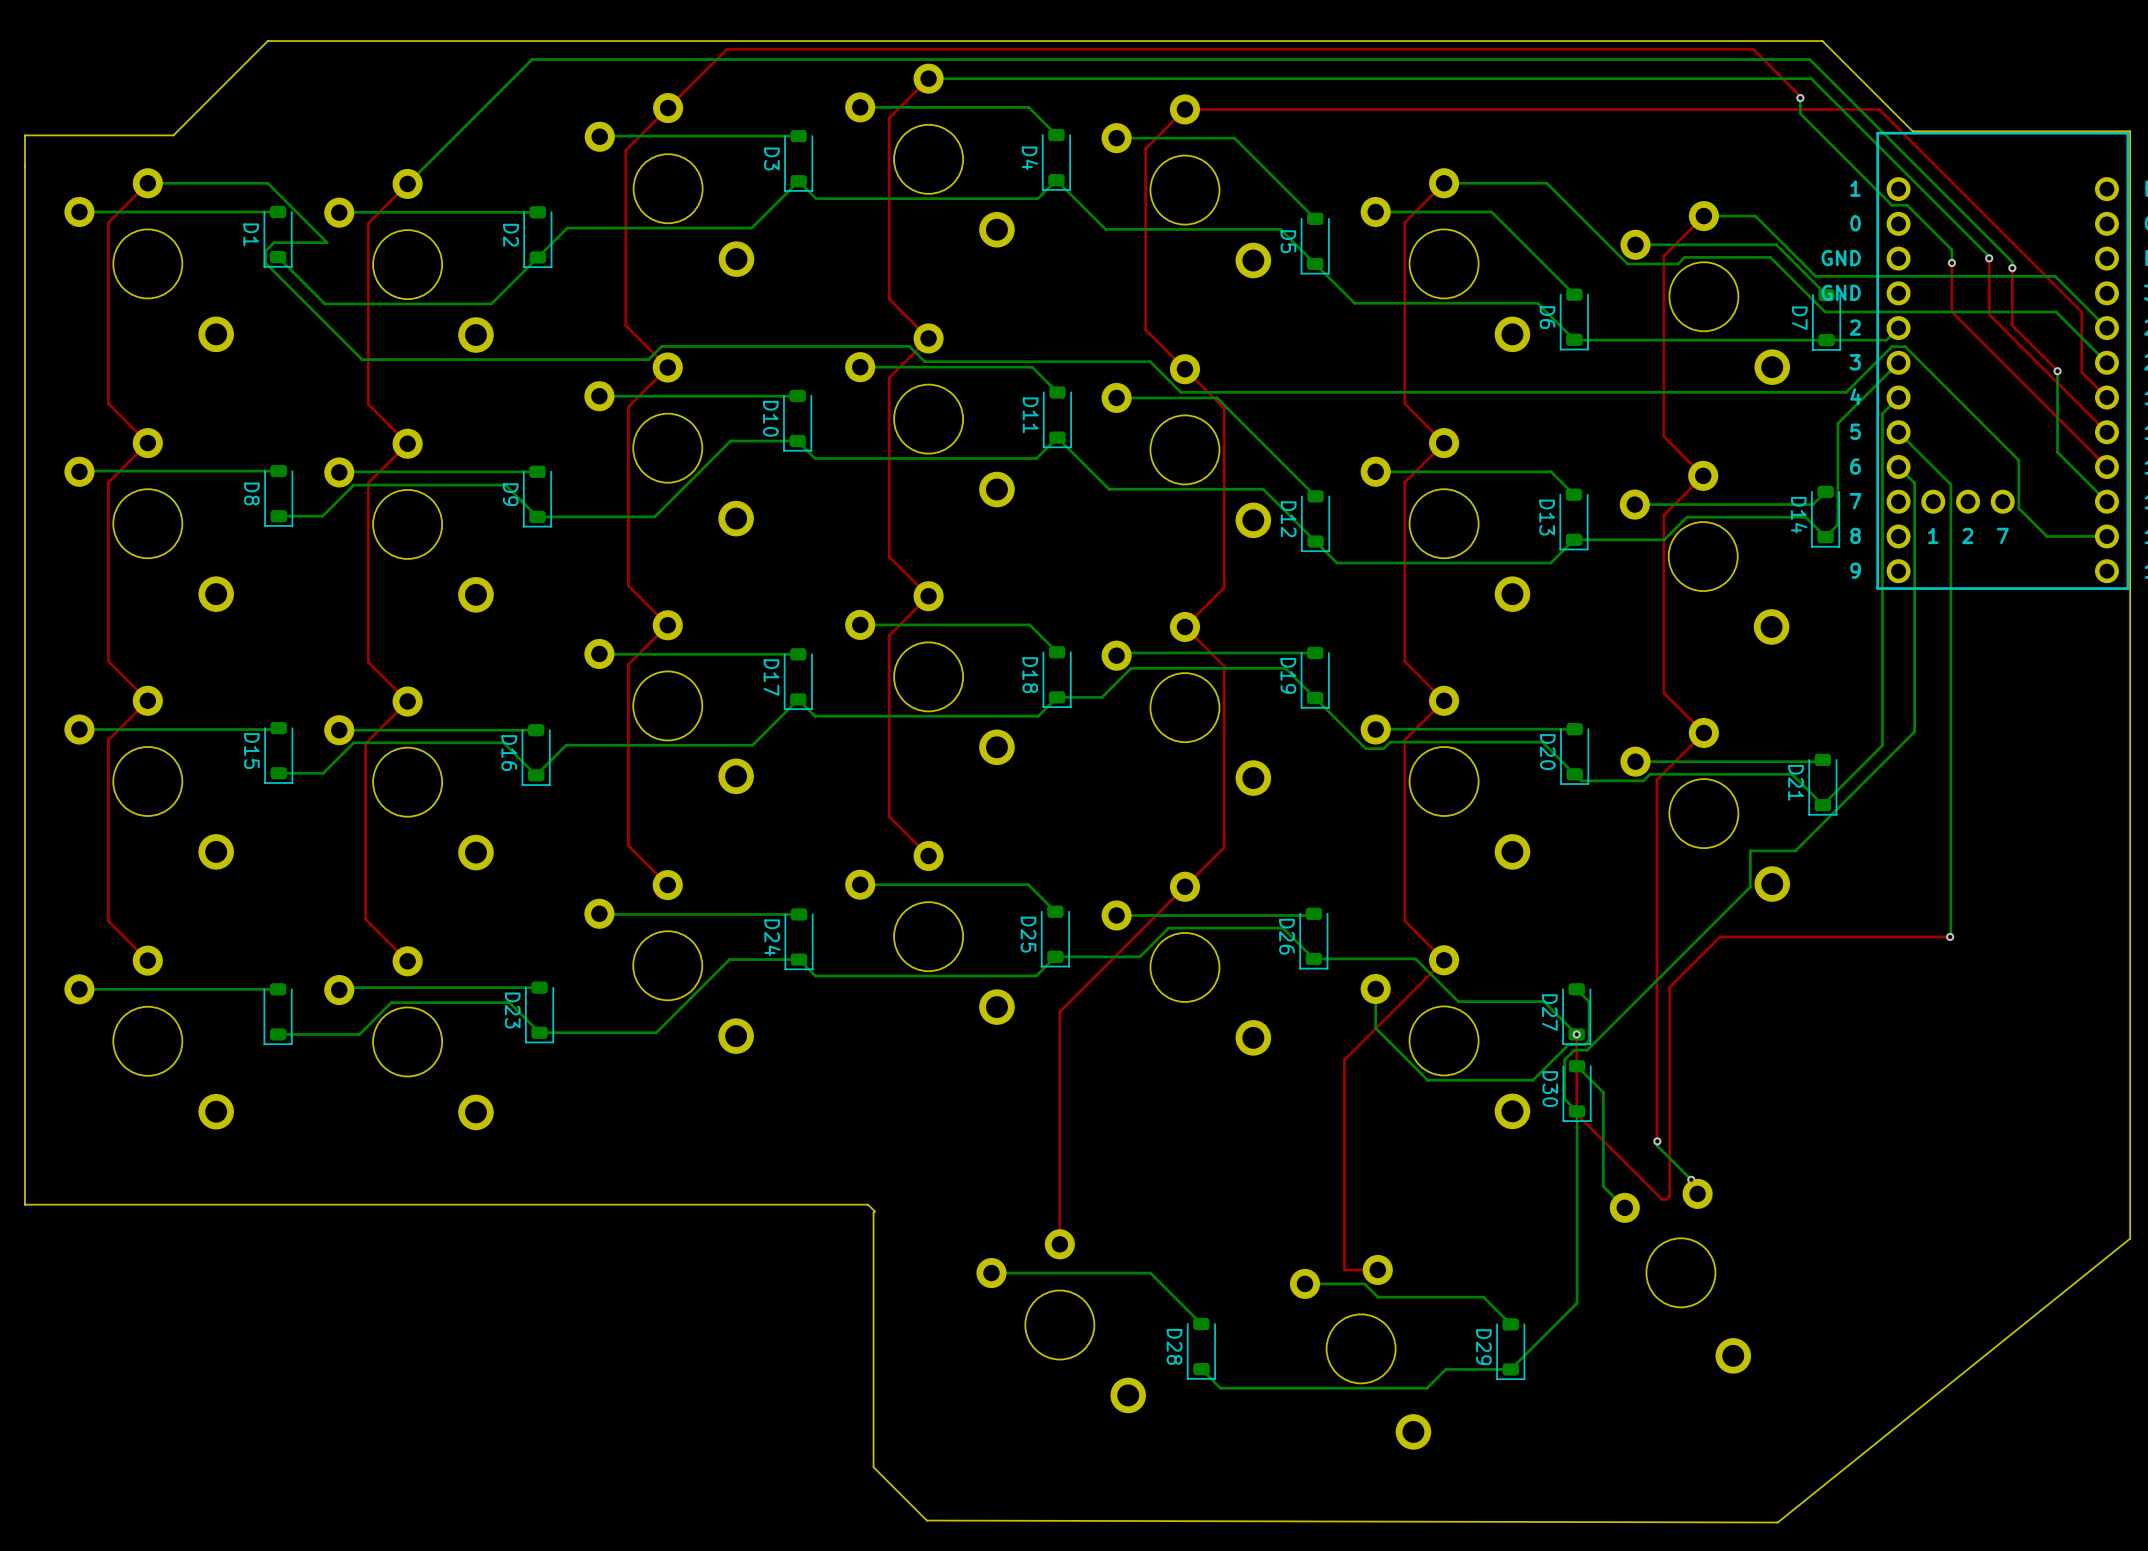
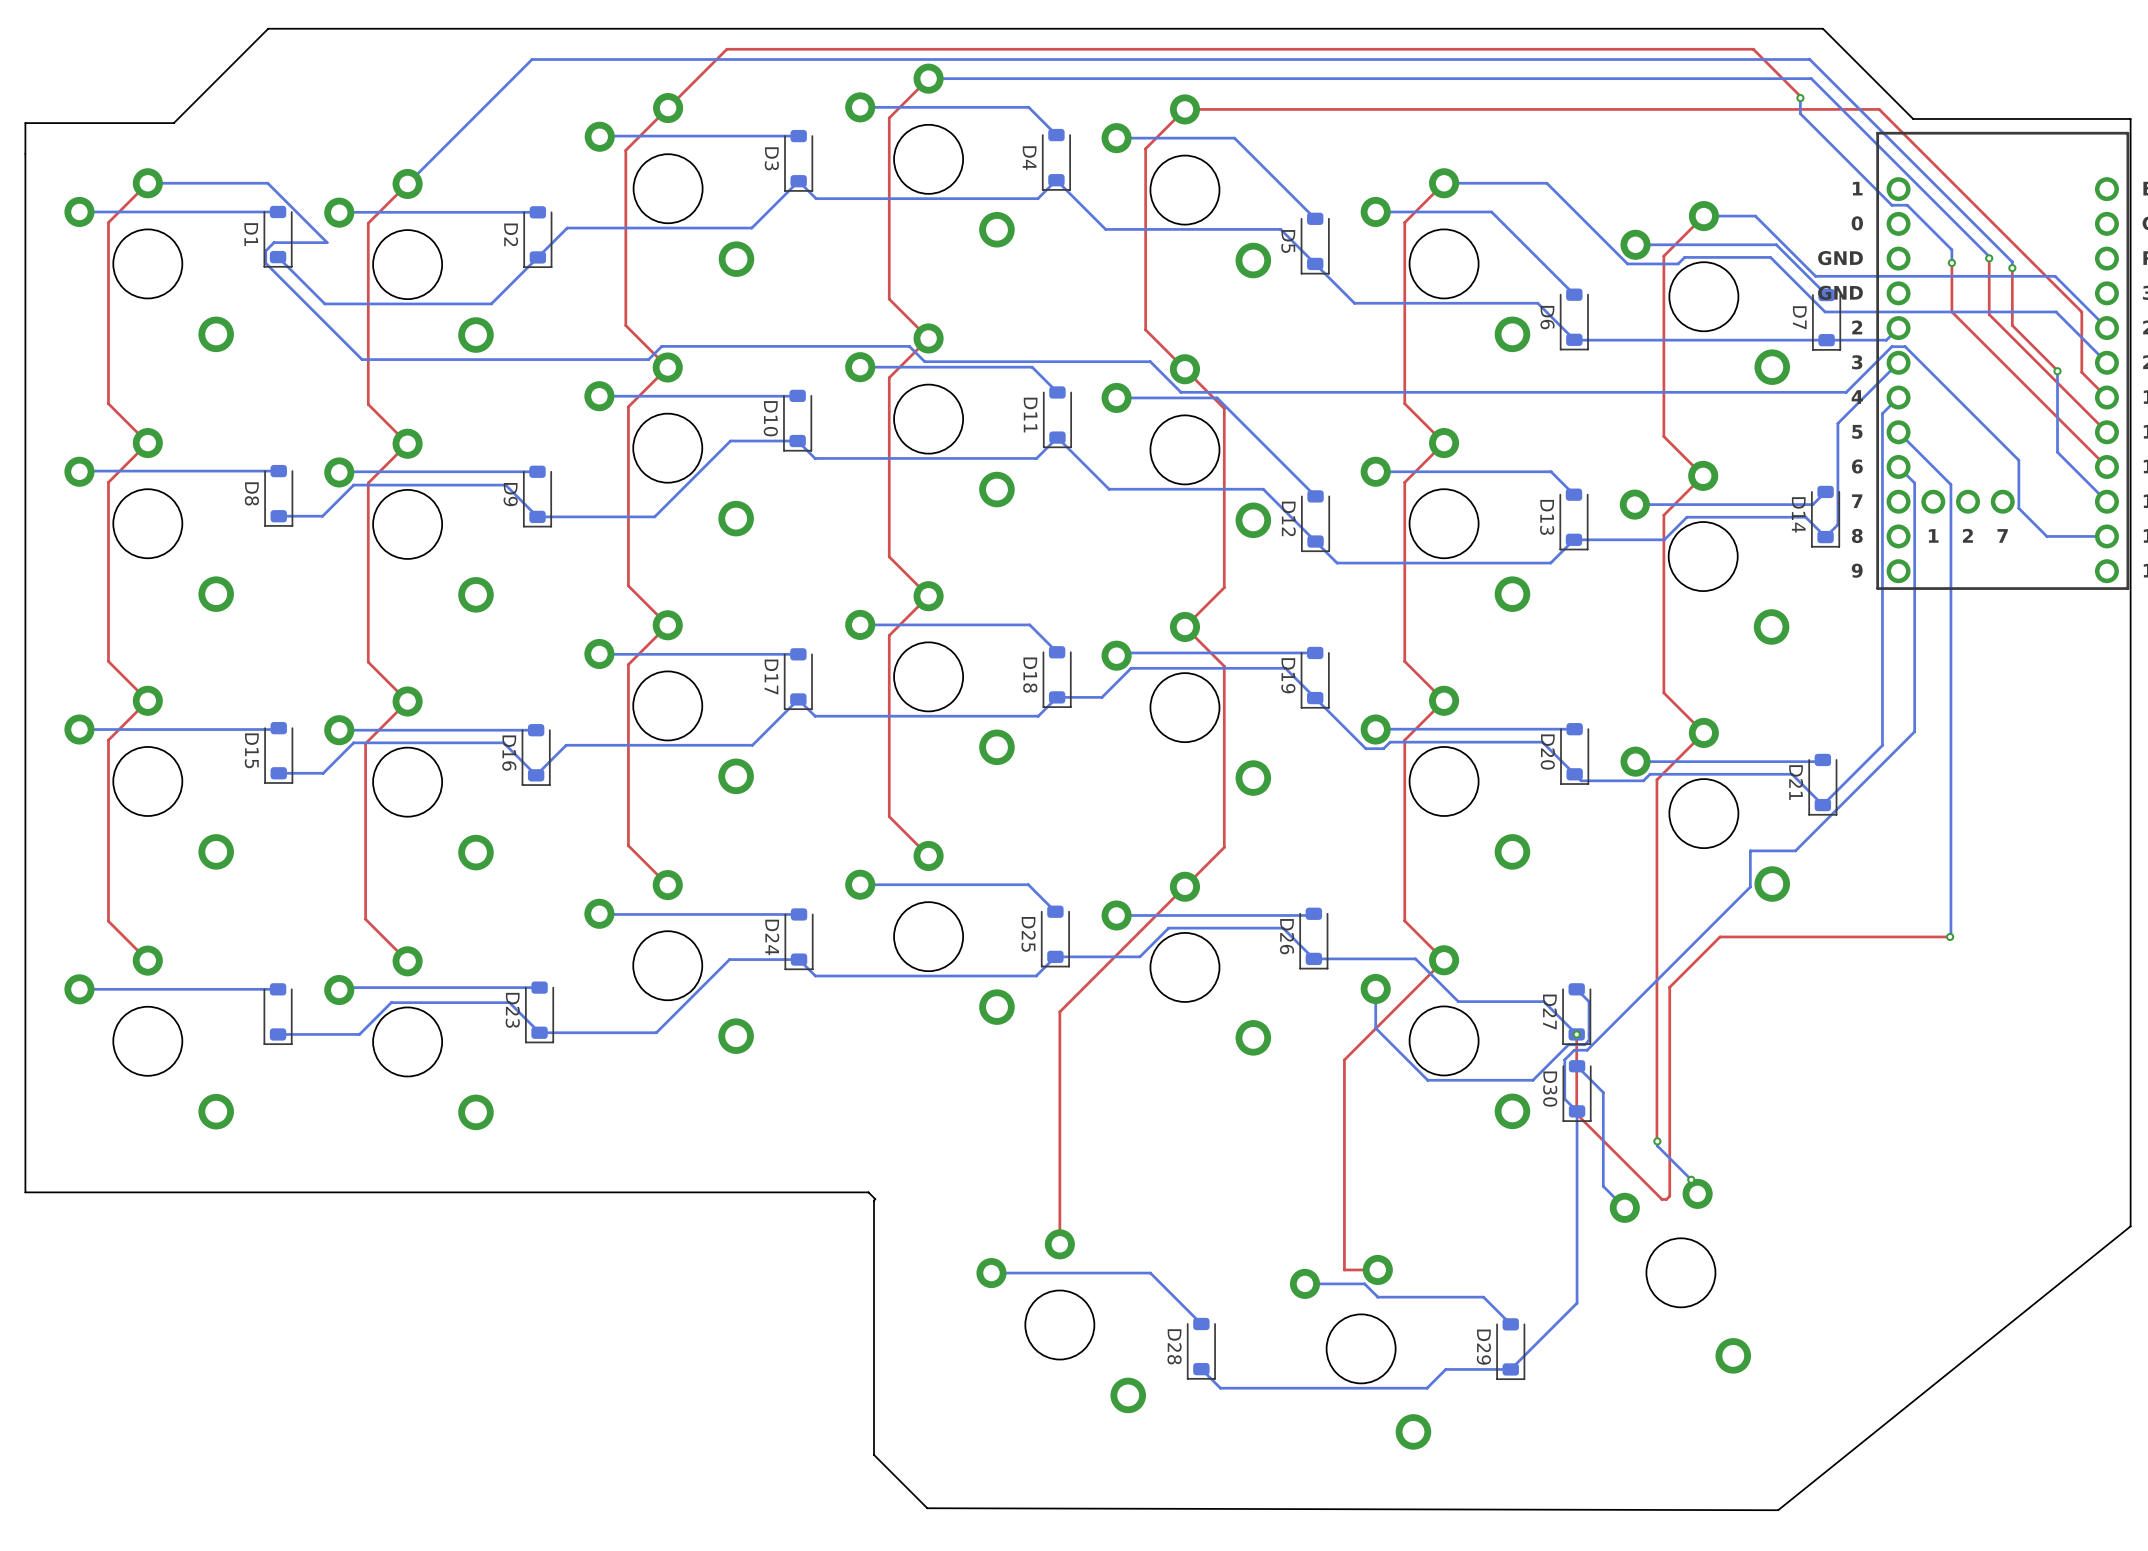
board edge: (1822, 41) (267, 41) (173, 135) (24, 135) (24, 1204) (868, 1204) (874, 1211) (873, 1467) (926, 1520) (1777, 1522) (2130, 1238) (2130, 131) (1912, 131) (1822, 41) -> (1822, 28) (268, 28) (173, 123) (25, 123) (25, 1192) (868, 1192) (875, 1199) (873, 1454) (927, 1508) (1778, 1510) (2130, 1226) (2130, 118) (1913, 118) (1822, 28)

